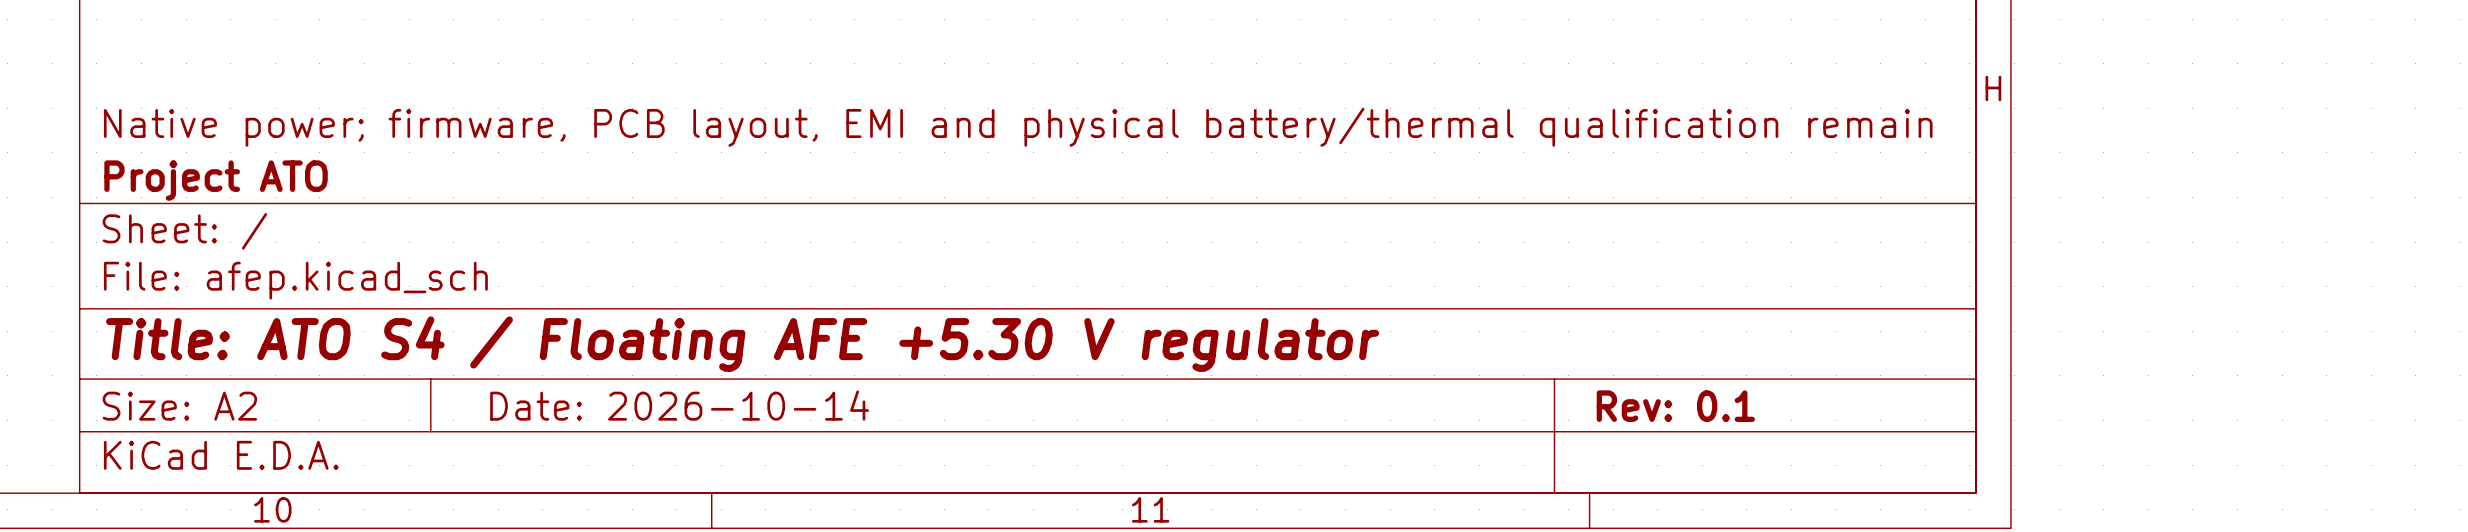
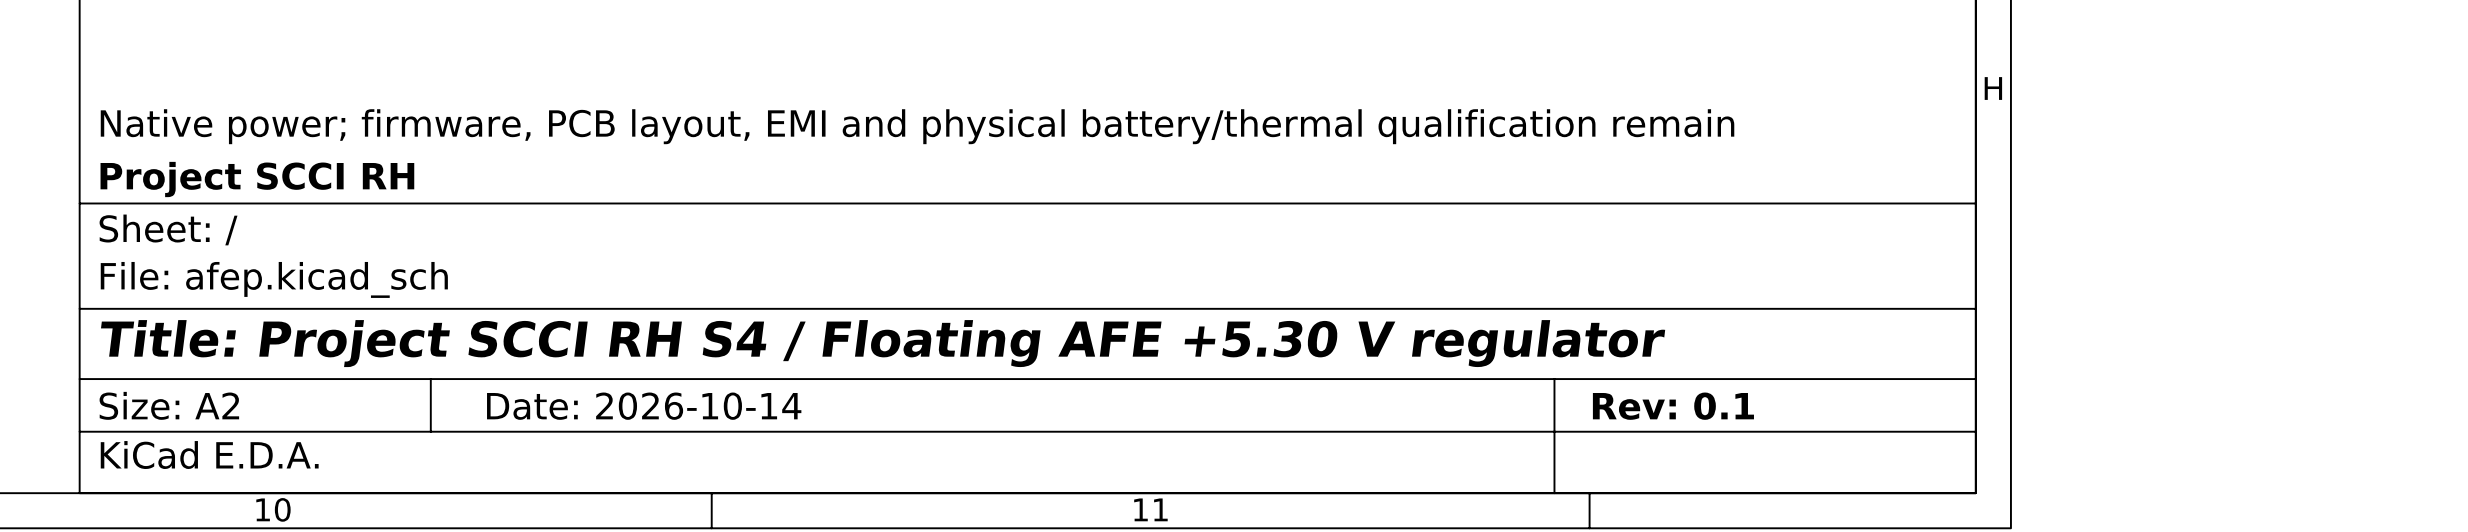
title block: Project ATO (216, 180) -> Project SCCI RH (257, 179)
title block: Title: ATO S4 / Floating AFE +5.30 V regulator (742, 344) -> Title: Project SCCI RH S4 / Floating AFE +5.30 V regulator (883, 343)

